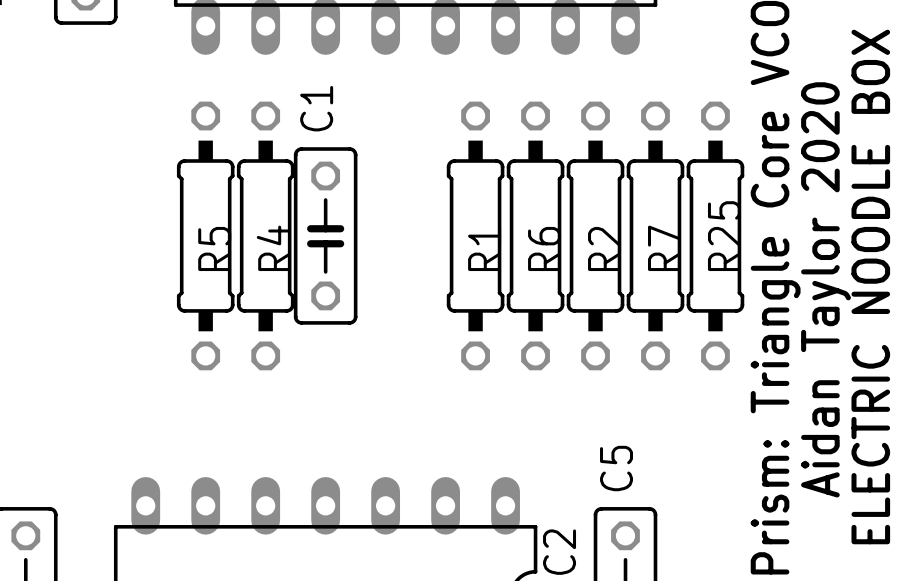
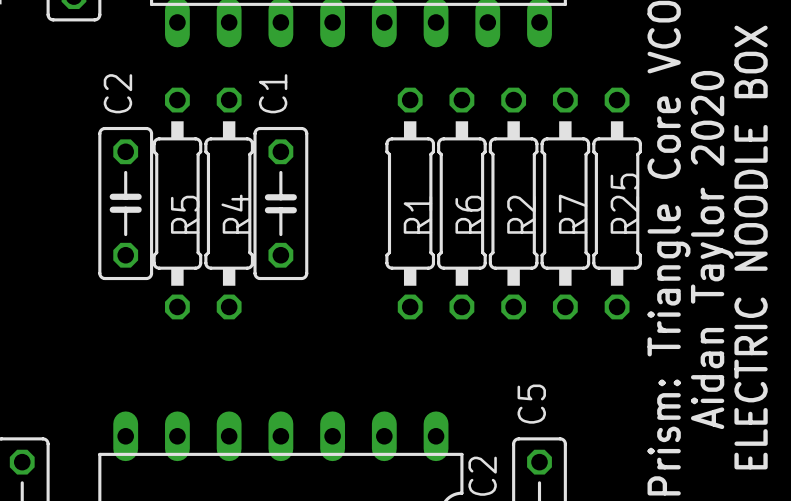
C2: none -> (125, 203)

